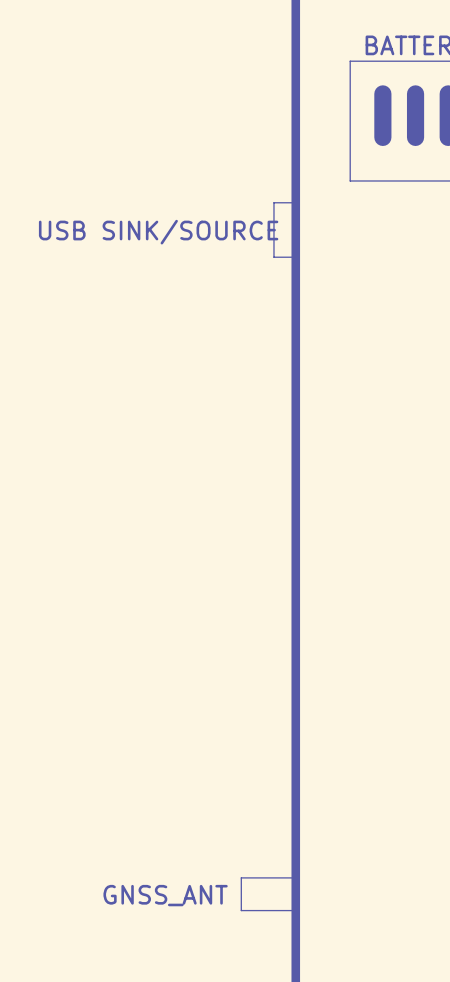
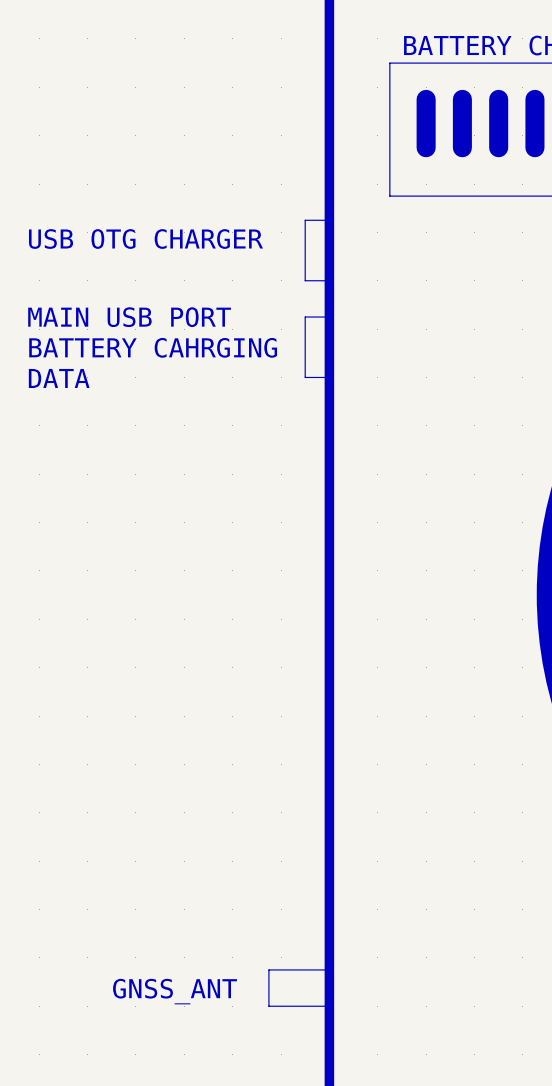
text: USB SINK/SOURCE (158, 232) -> USB OTG CHARGER (145, 239)
line: none -> (305, 317) (329, 317) (329, 377) (305, 377) (305, 317)
text: none -> MAIN USB PORT (129, 317)
text: none -> BATTERY CAHRGING (153, 347)
text: none -> DATA (59, 378)

